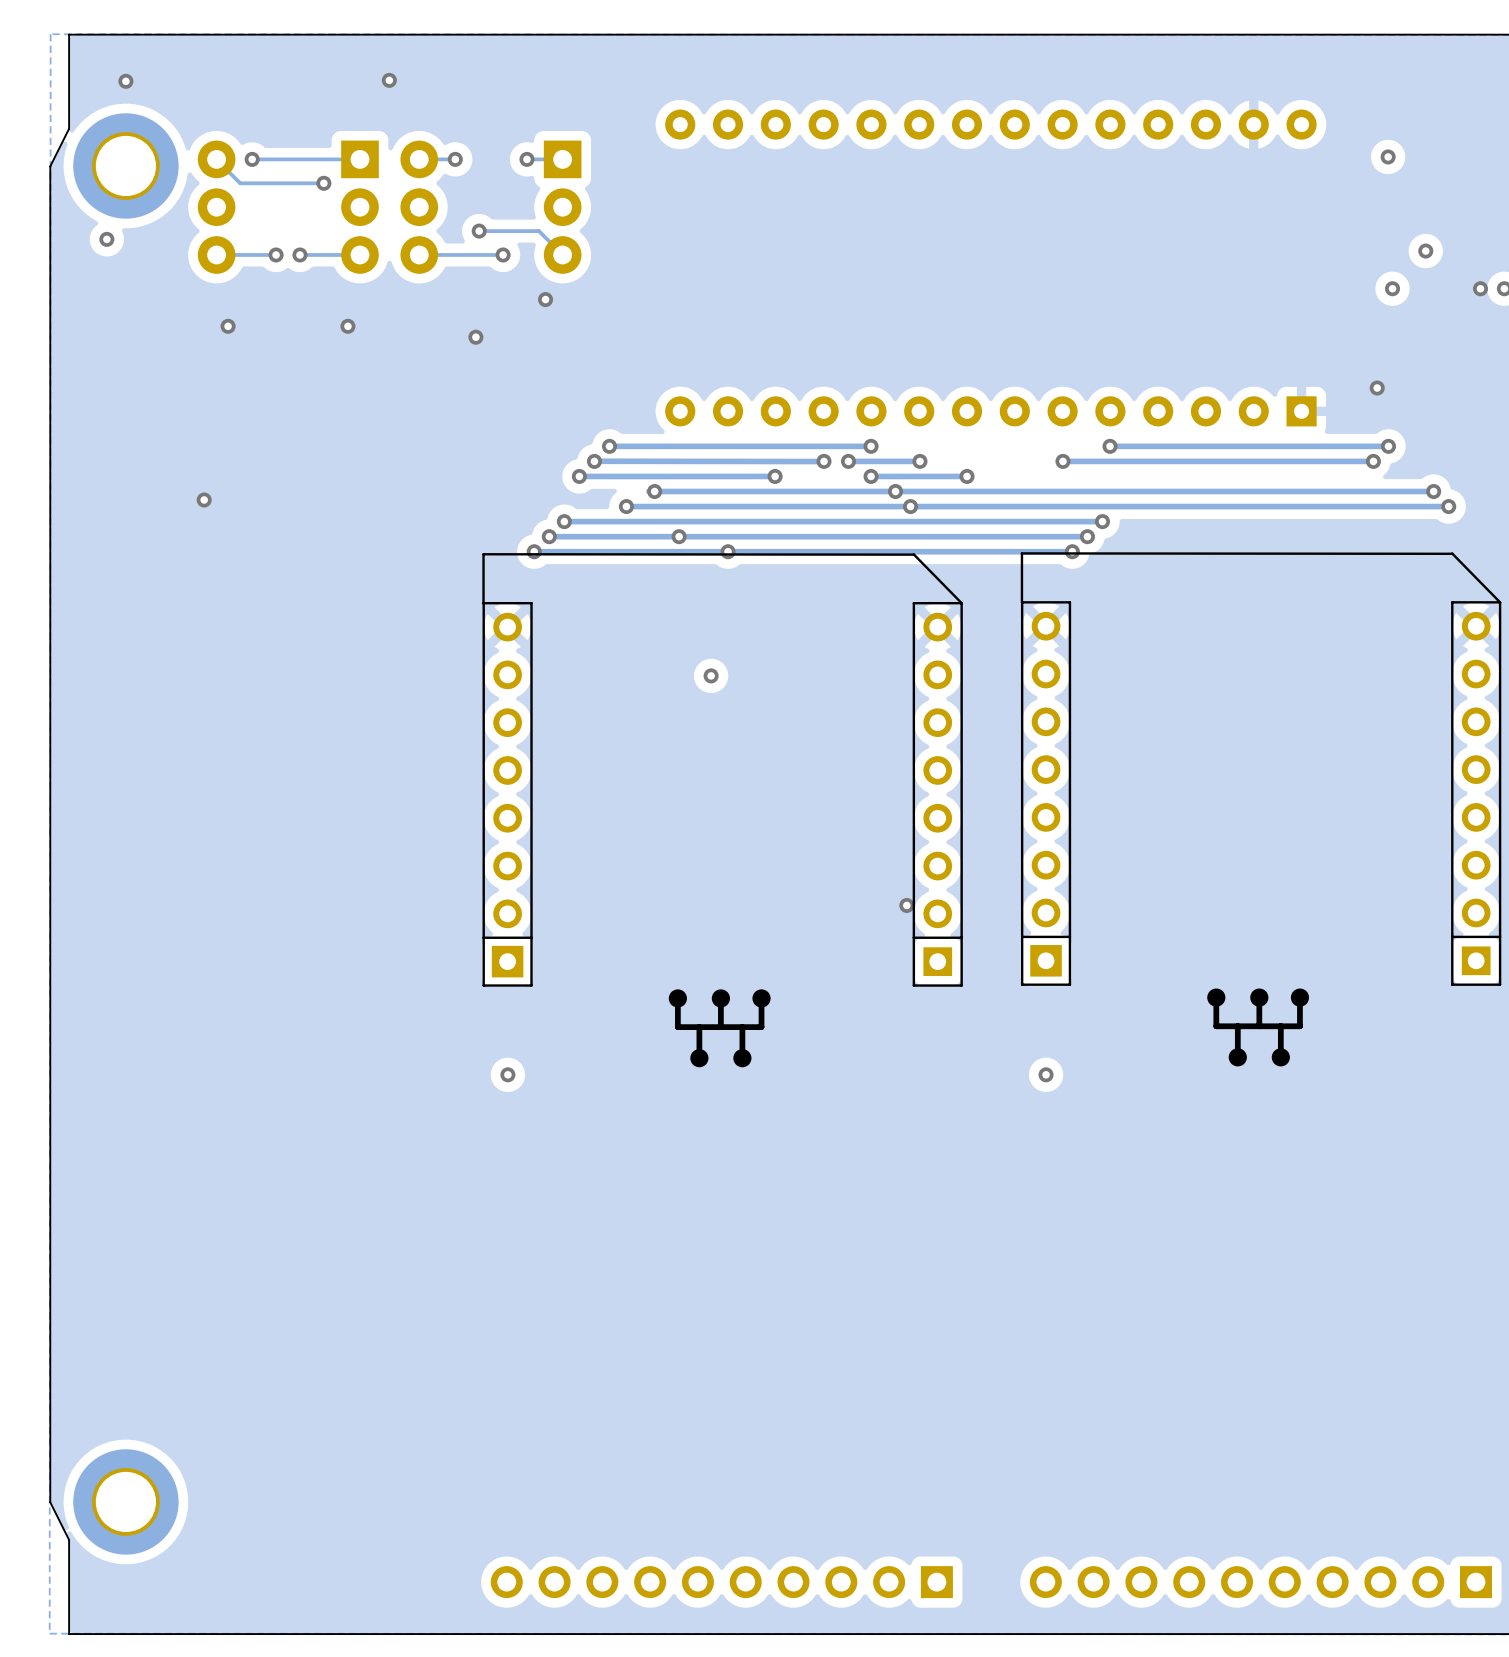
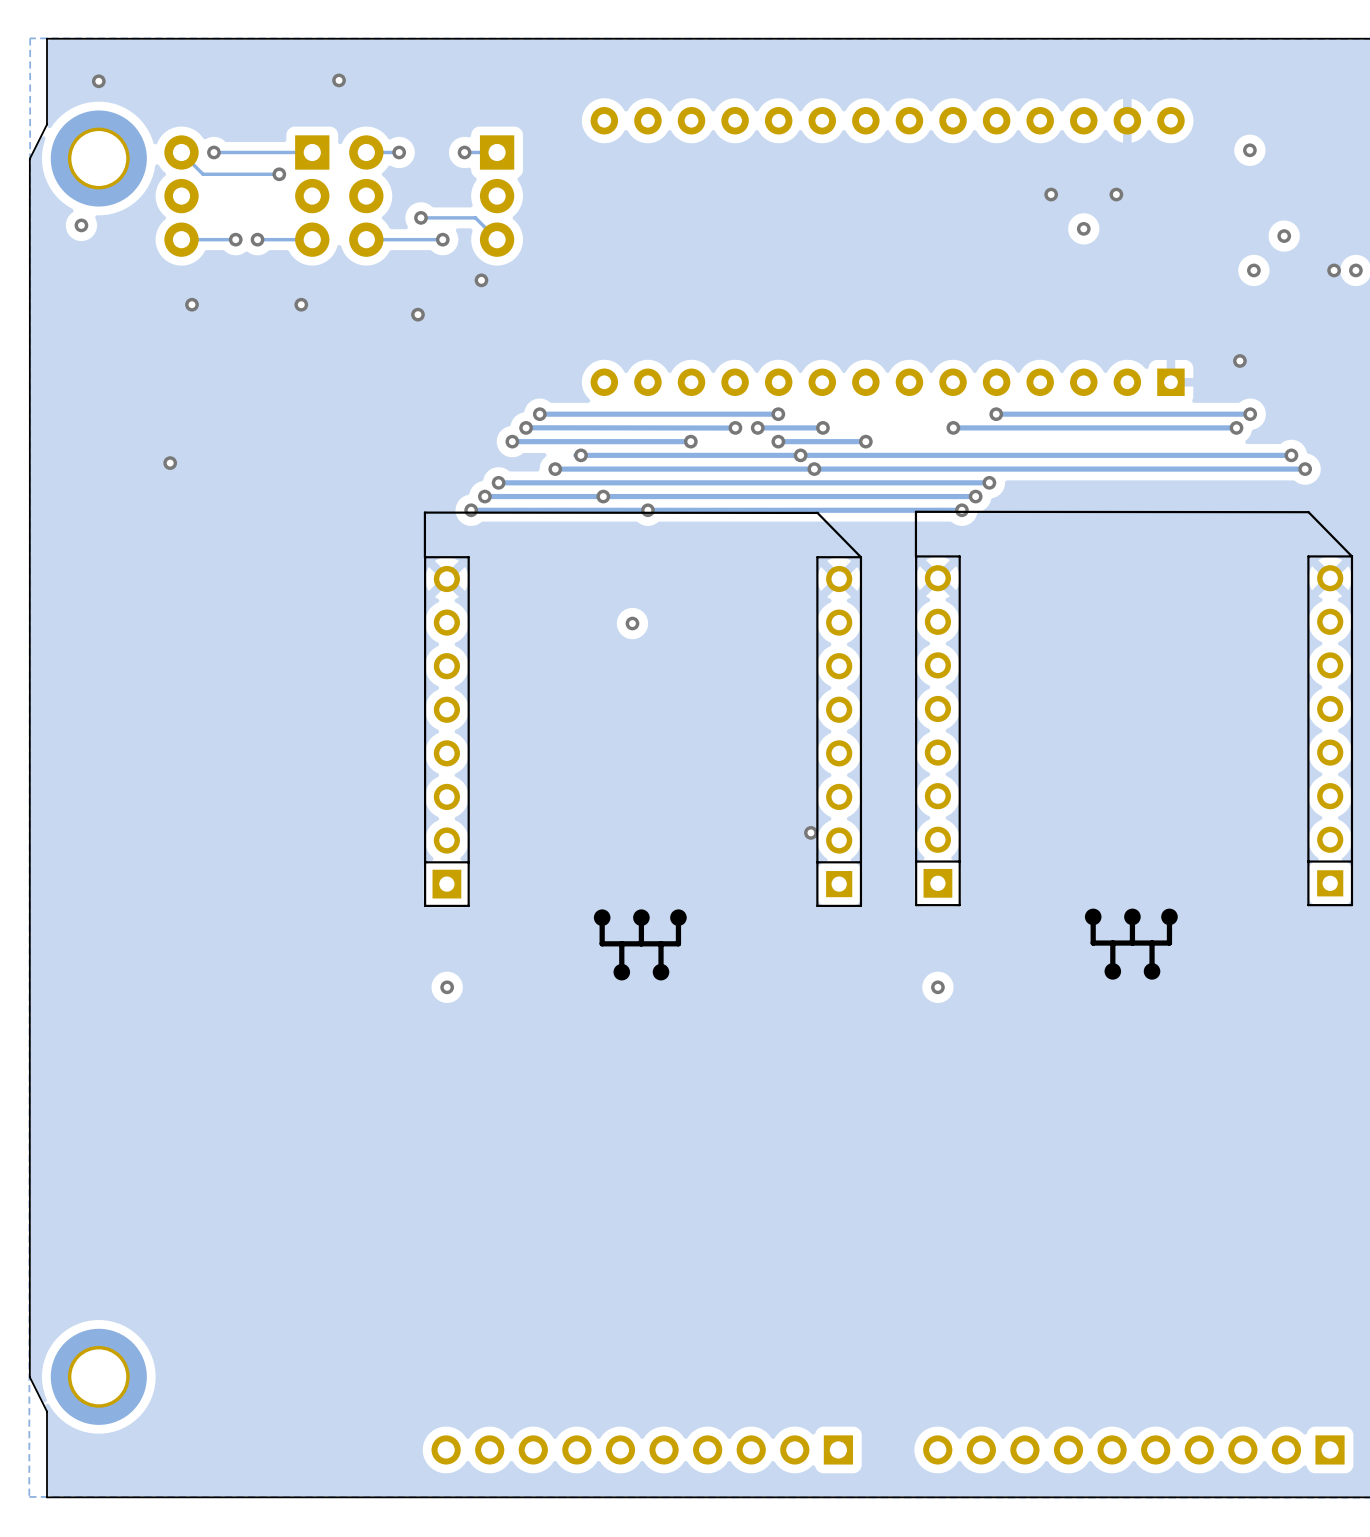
via: none -> (1051, 194)
via: none -> (1116, 194)
via: none -> (1083, 228)

